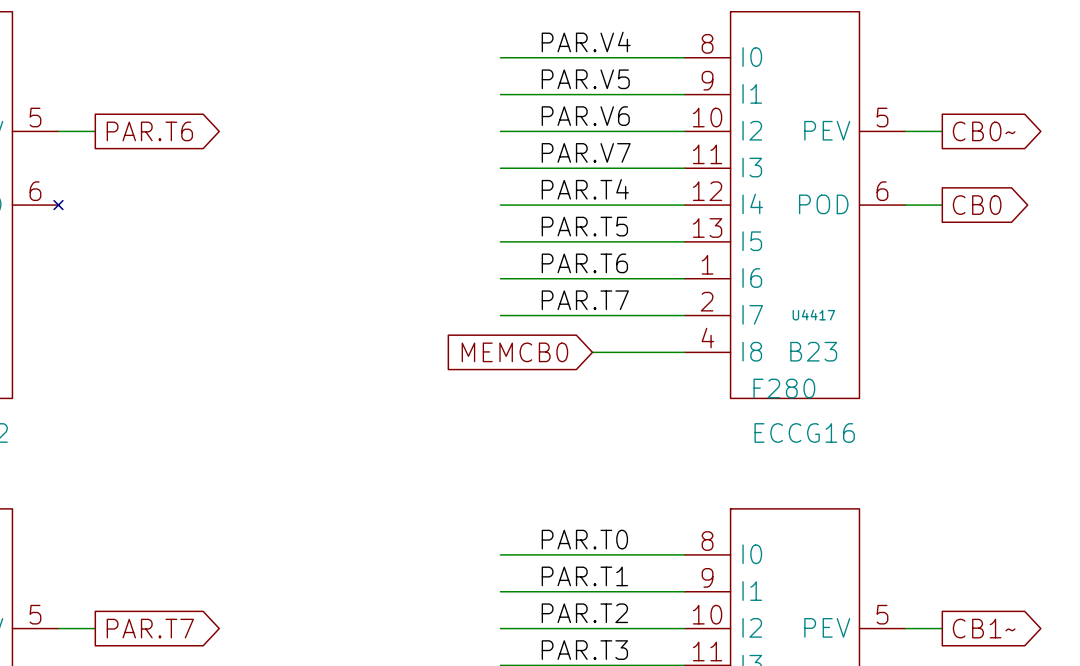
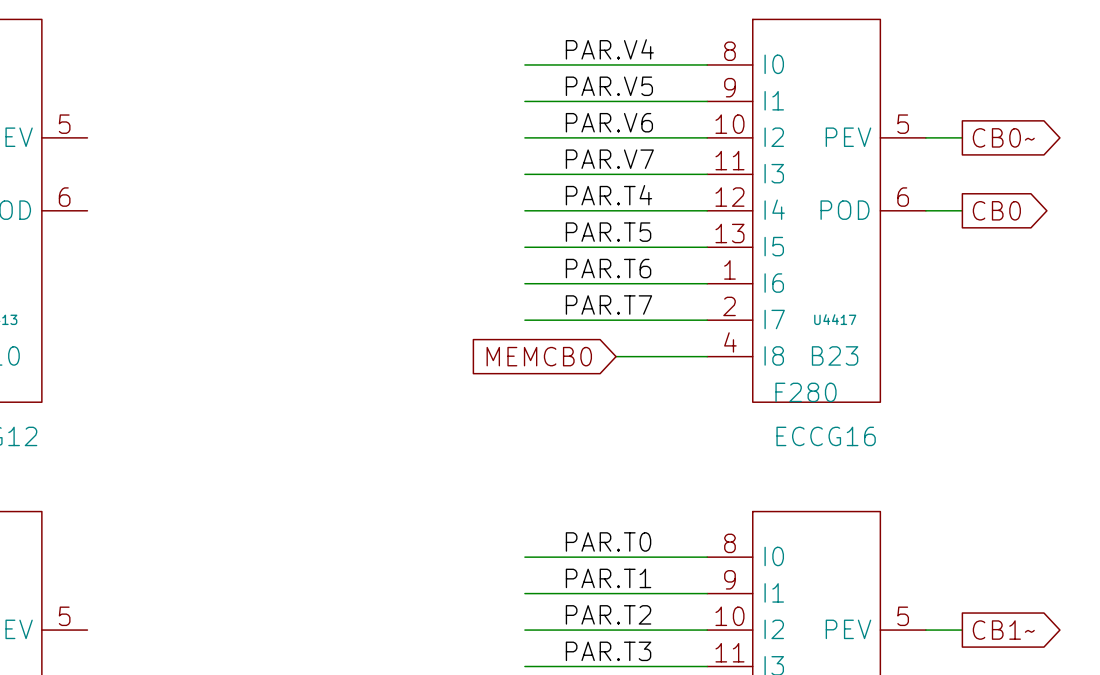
wire: (58, 131) (95, 131) -> none
global label: PAR.T6 (149, 131) -> none
no-connect mark: (58, 205) -> none
wire: (58, 628) (95, 628) -> none
global label: PAR.T7 (150, 628) -> none

